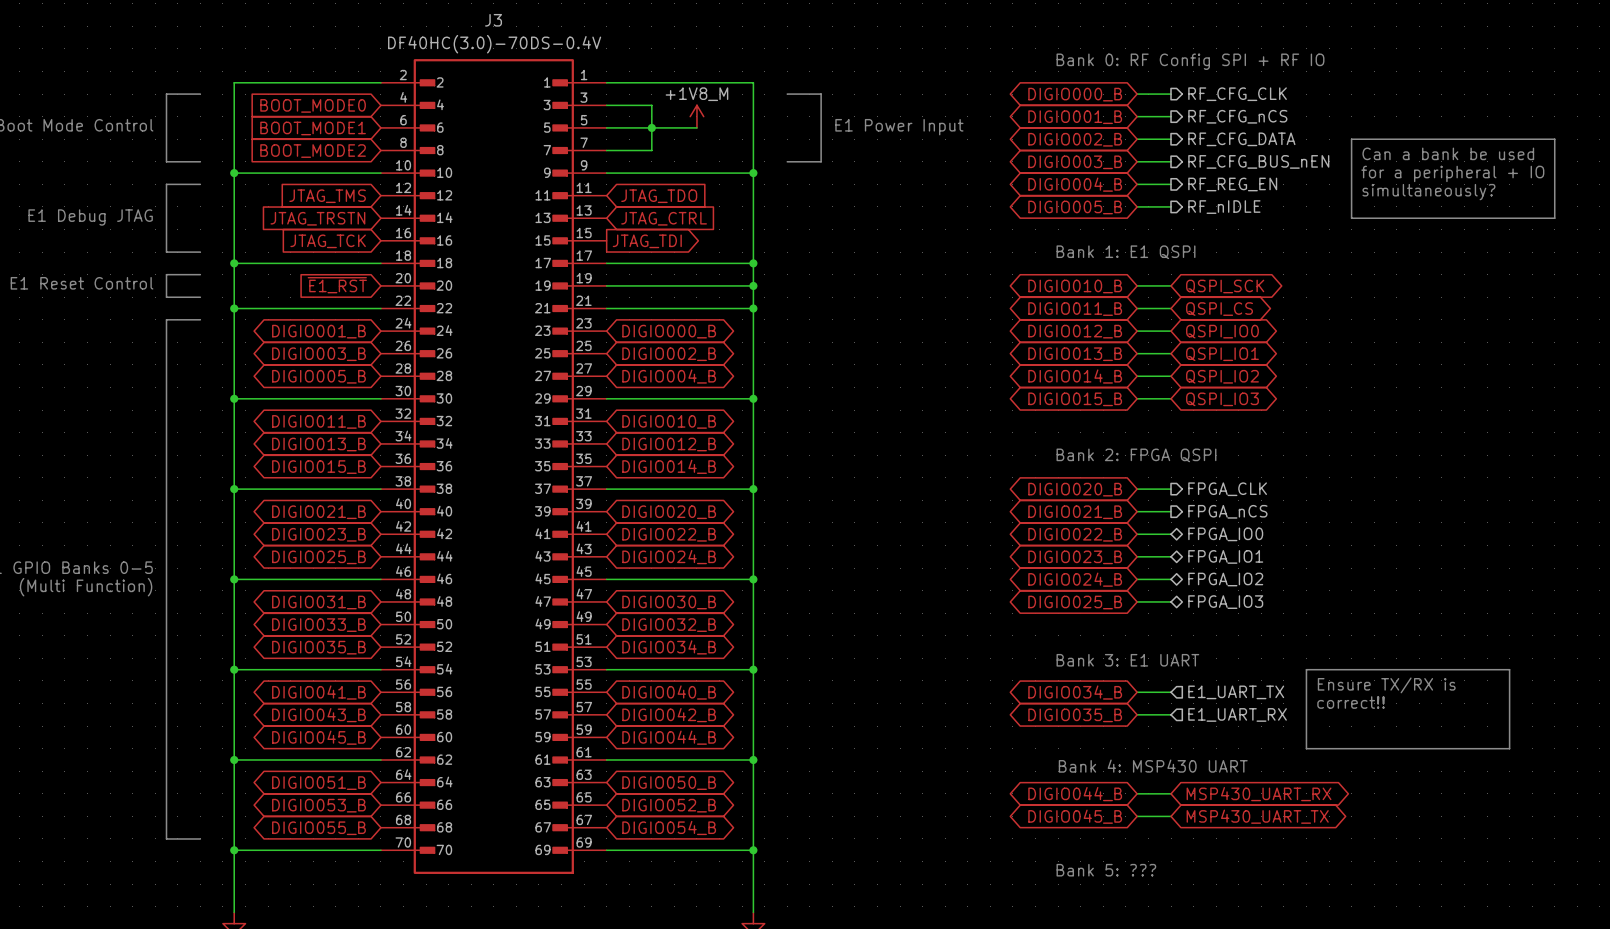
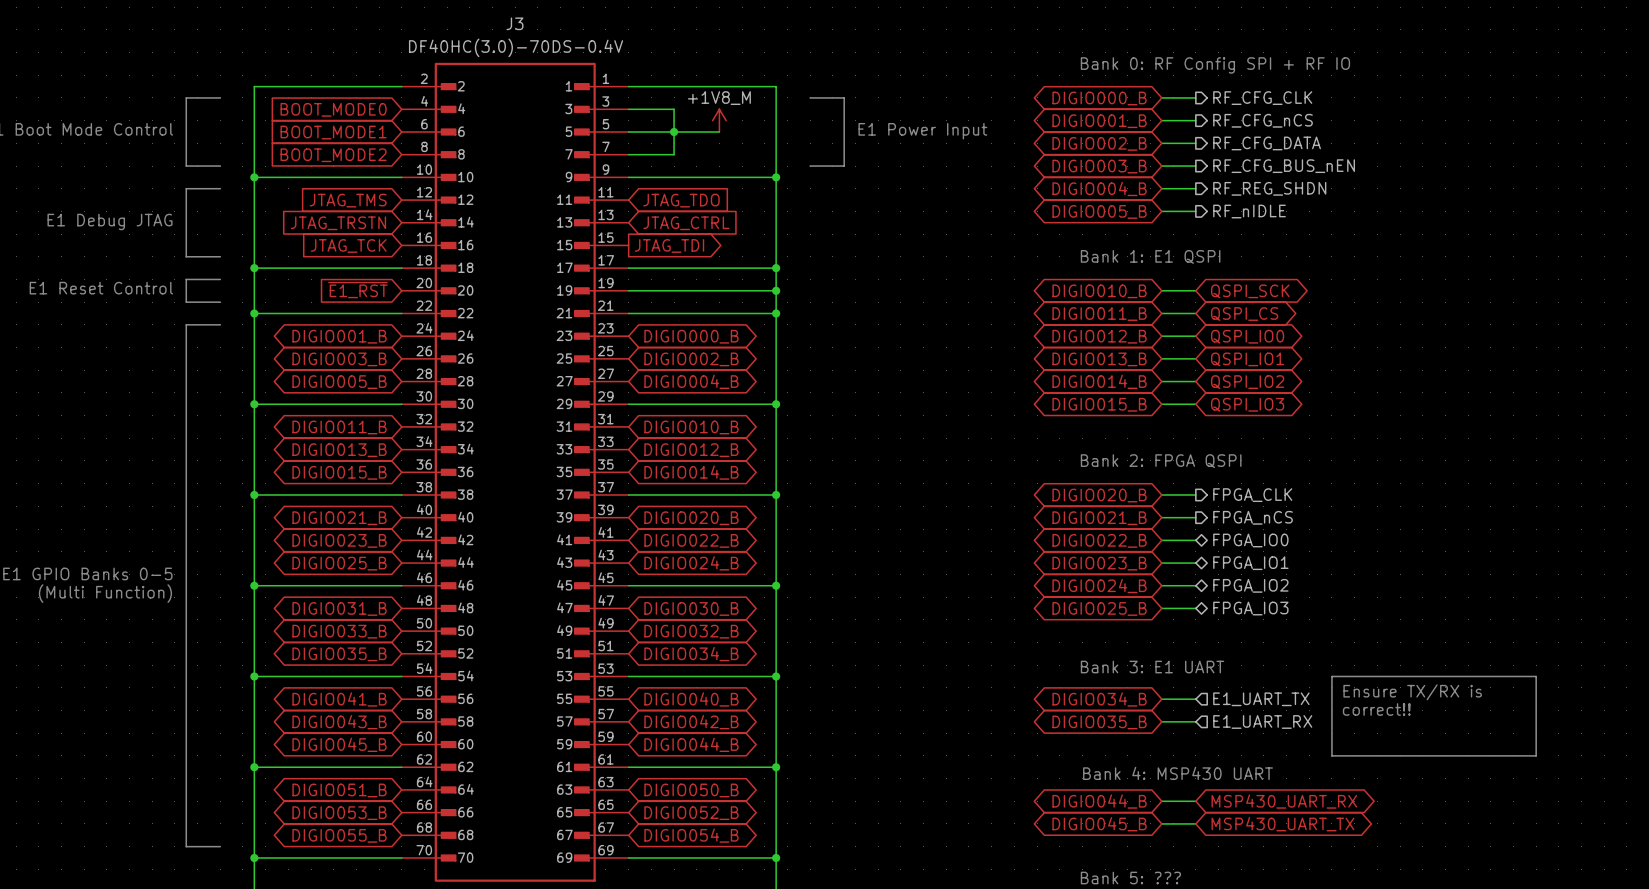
line: (1351, 139) (1554, 139) (1554, 218) (1351, 218) (1351, 139) -> none
text: Can a bank be used (1448, 153) -> none
text: for a peripheral + IO (1452, 173) -> none
hierarchical label: RF_REG_EN (1232, 184) -> RF_REG_SHDN (1269, 188)
text: simultaneously? (1428, 192) -> none

